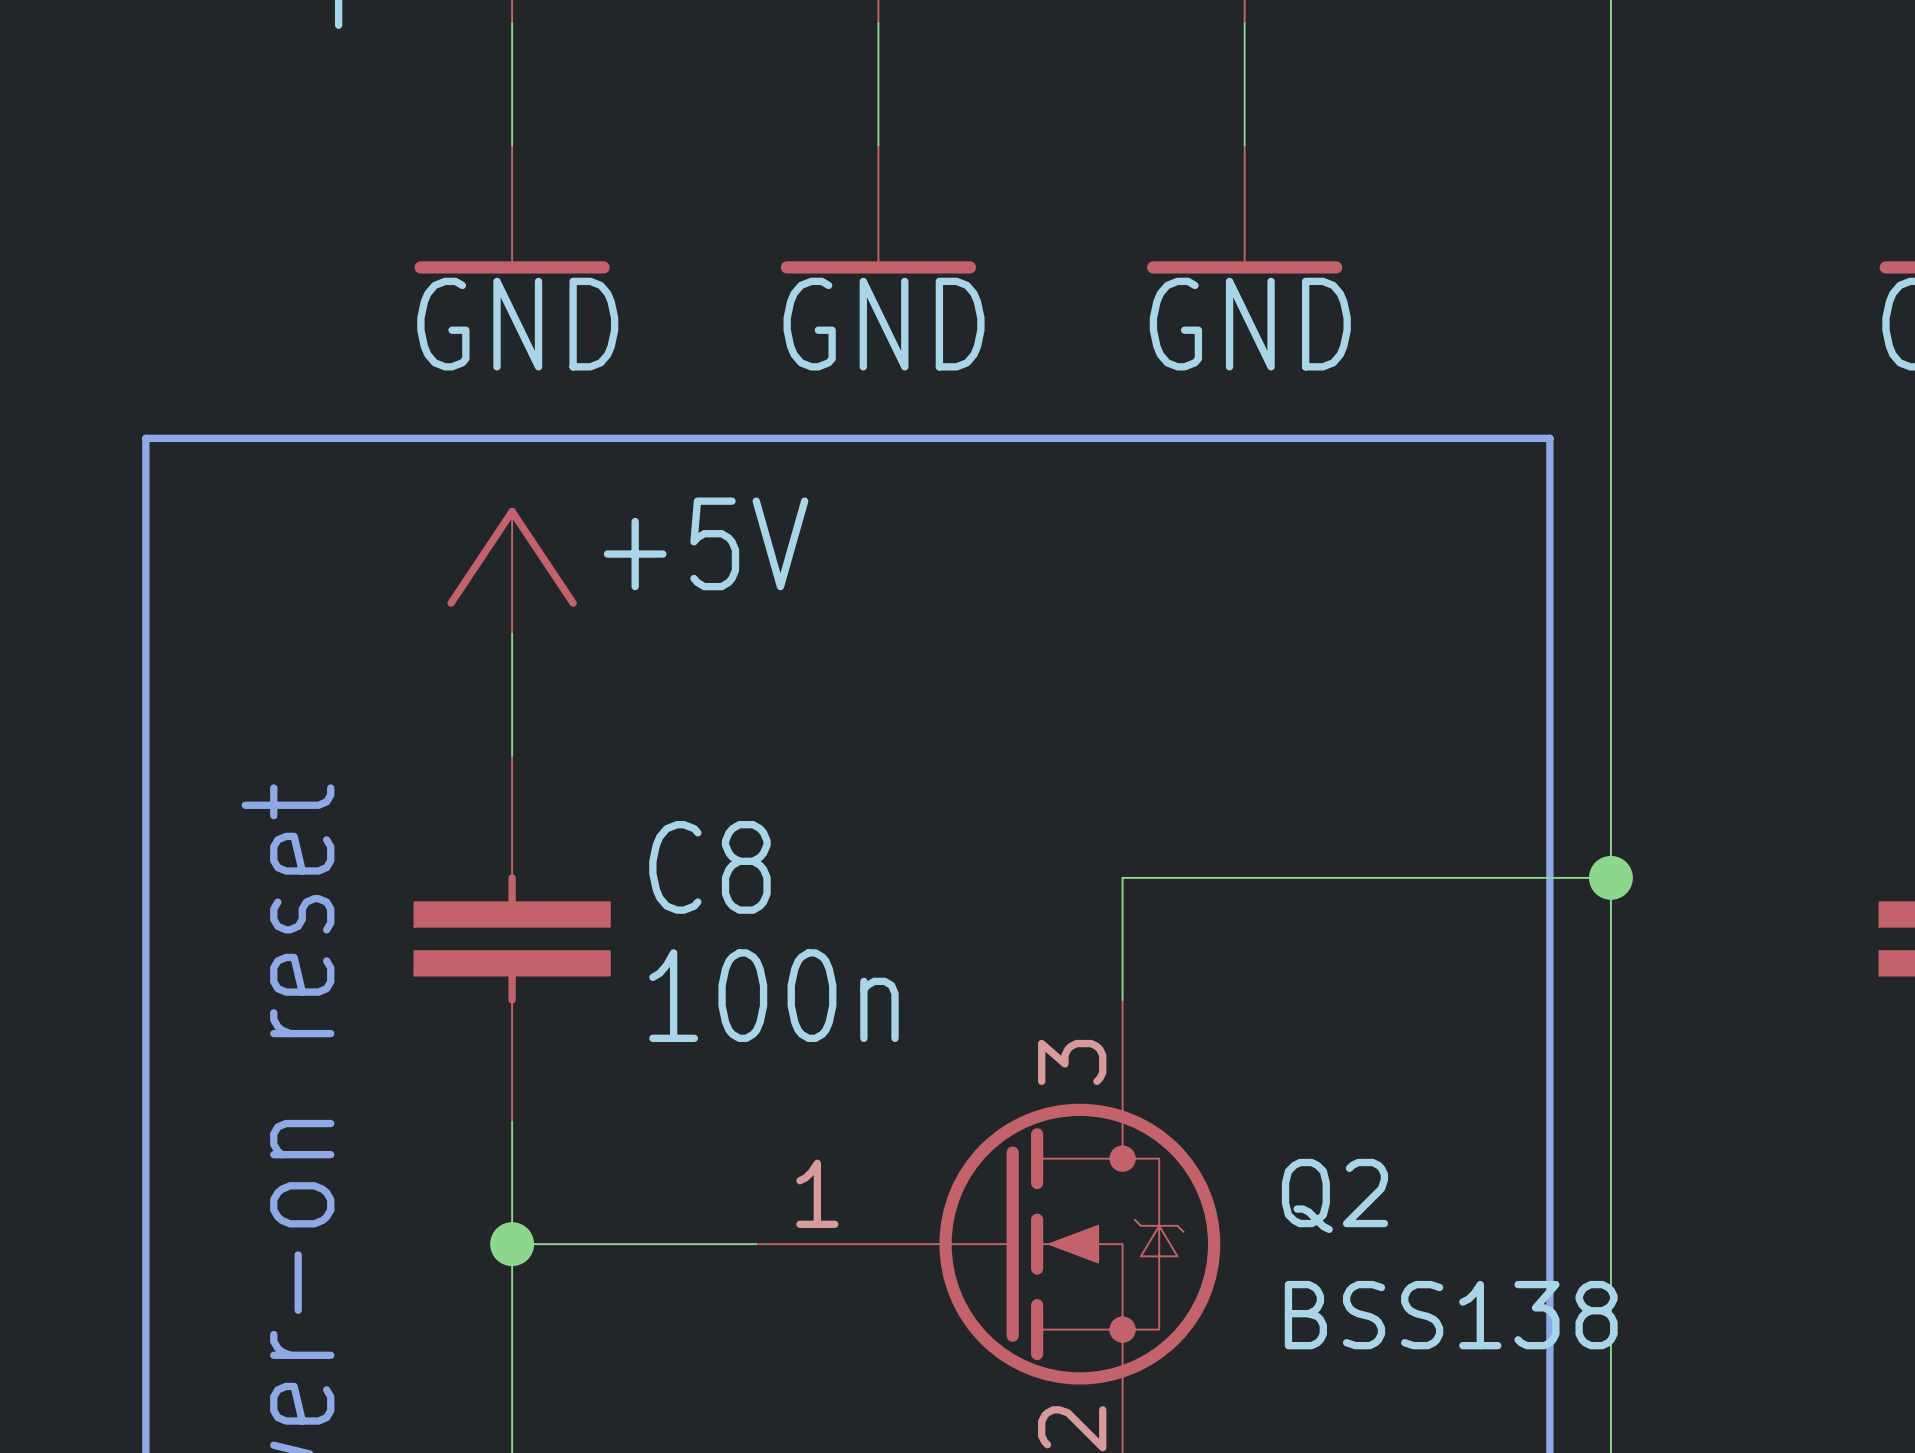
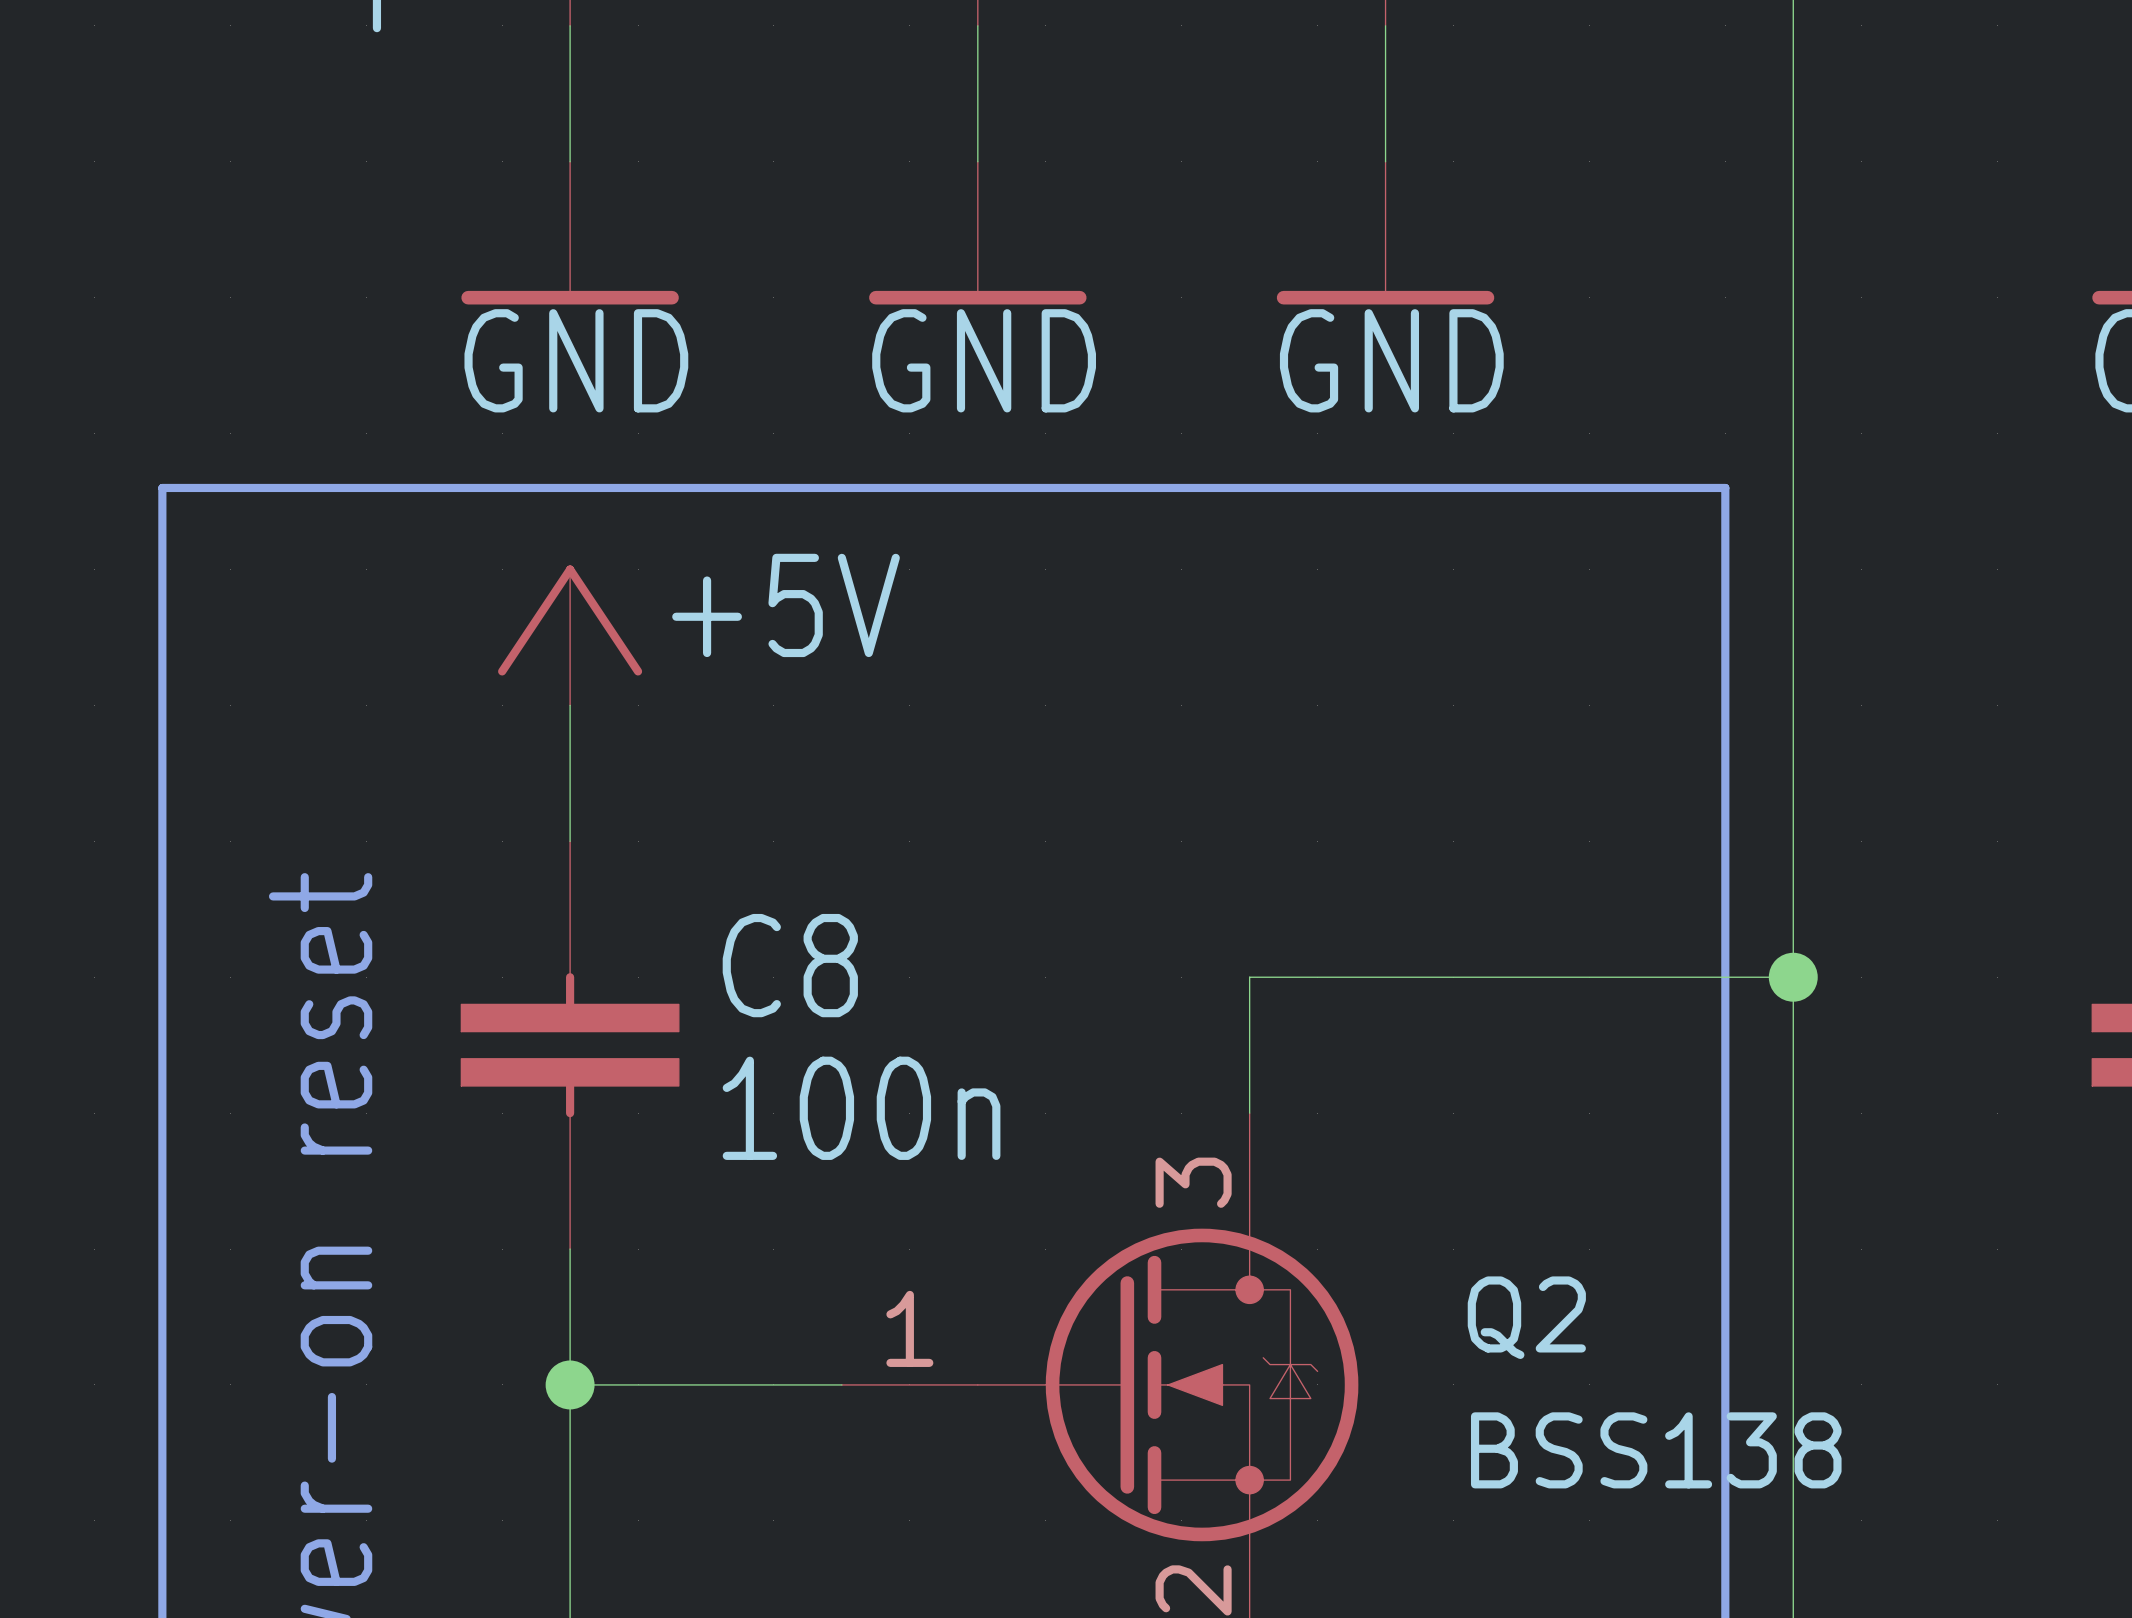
Q2 name position: Q2 (1334, 1195) -> Q2 (1526, 1317)
Q2 value position: BSS138 (1451, 1315) -> BSS138 (1656, 1450)

